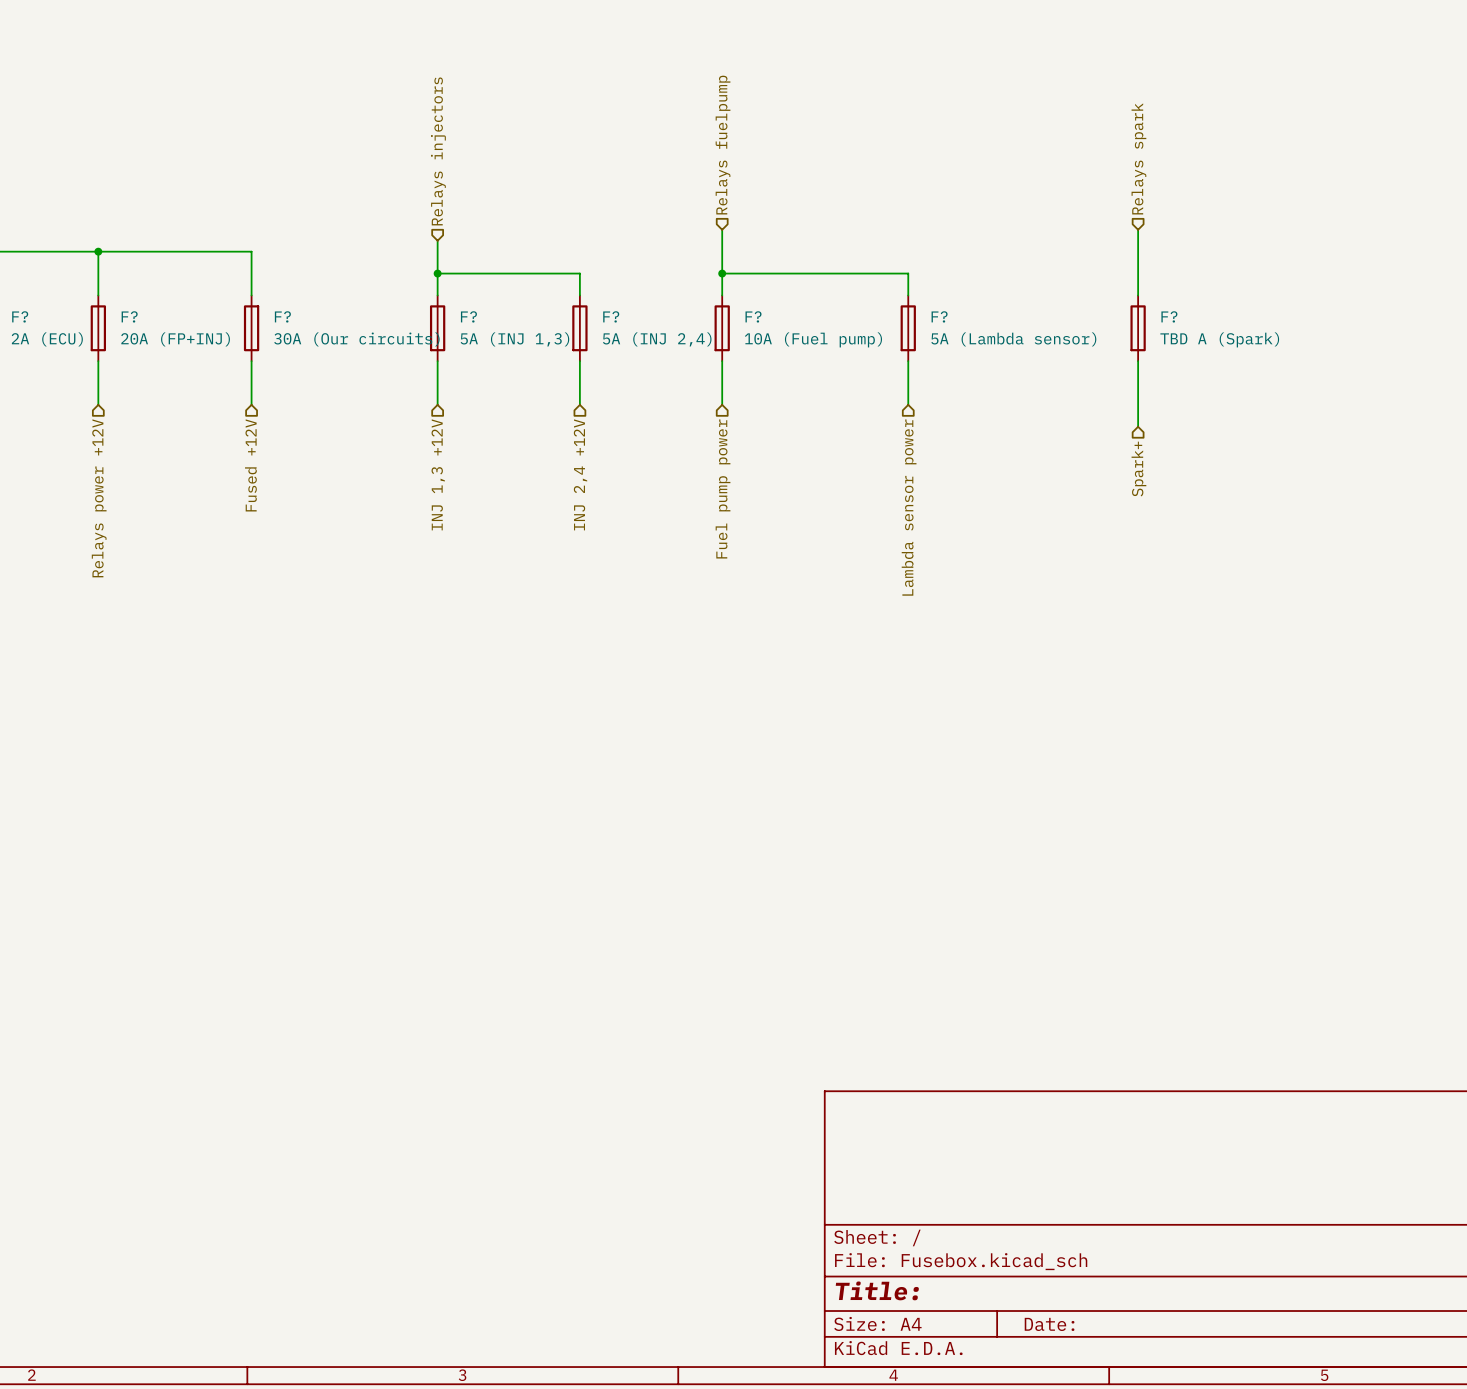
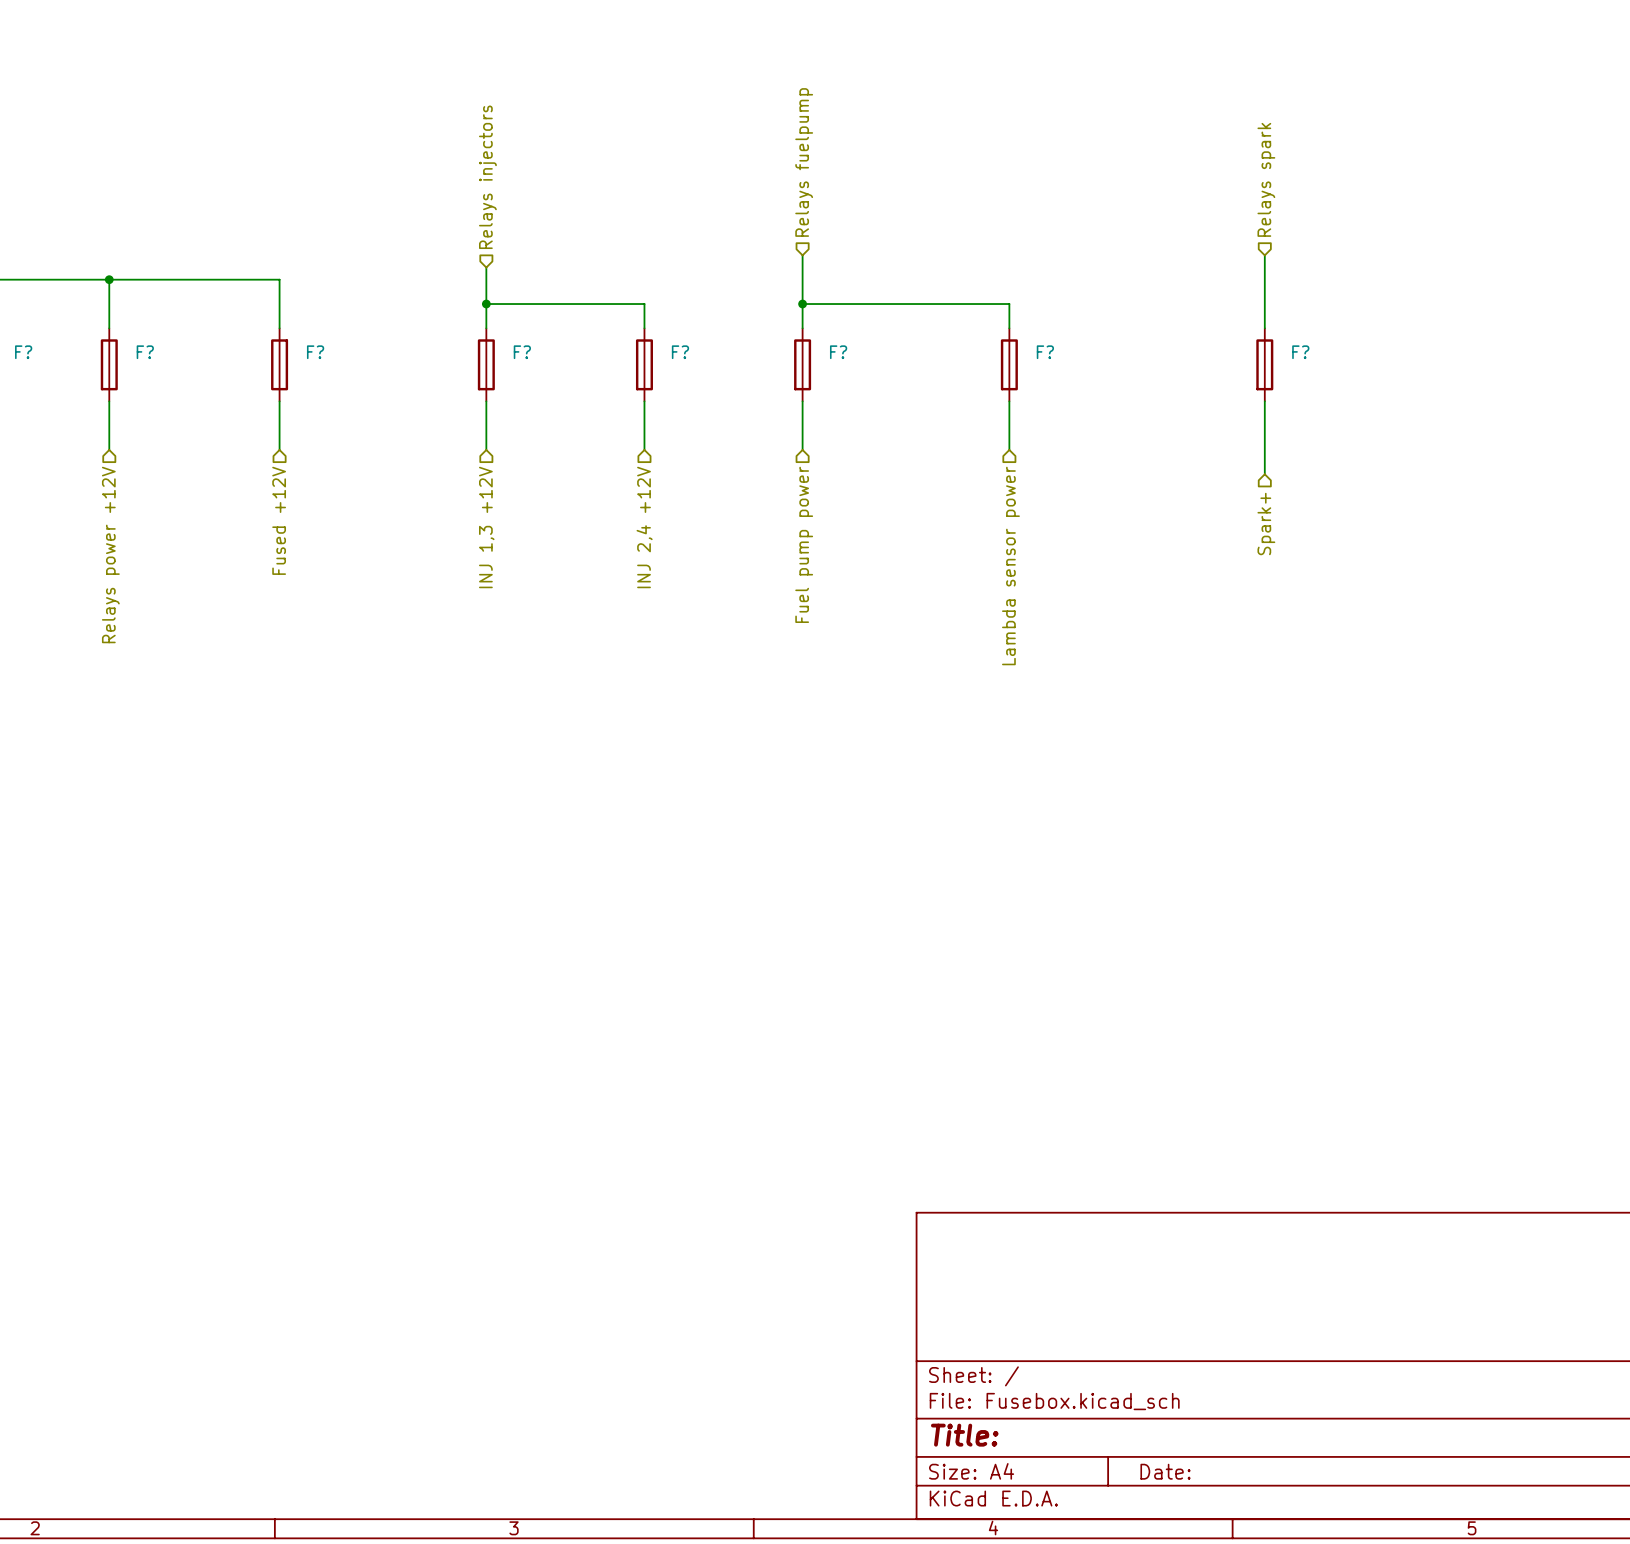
F? value: 2A (ECU) (47, 339) -> none
F? value: 20A (FP+INJ) (175, 339) -> none
F? value: 30A (Our circuits) (356, 339) -> none
F? value: 5A (INJ 1,3) (514, 339) -> none
F? value: 5A (INJ 2,4) (657, 339) -> none
F? value: 10A (Fuel pump) (813, 339) -> none
F? value: 5A (Lambda sensor) (1013, 339) -> none
F? value: TBD A (Spark) (1219, 339) -> none

